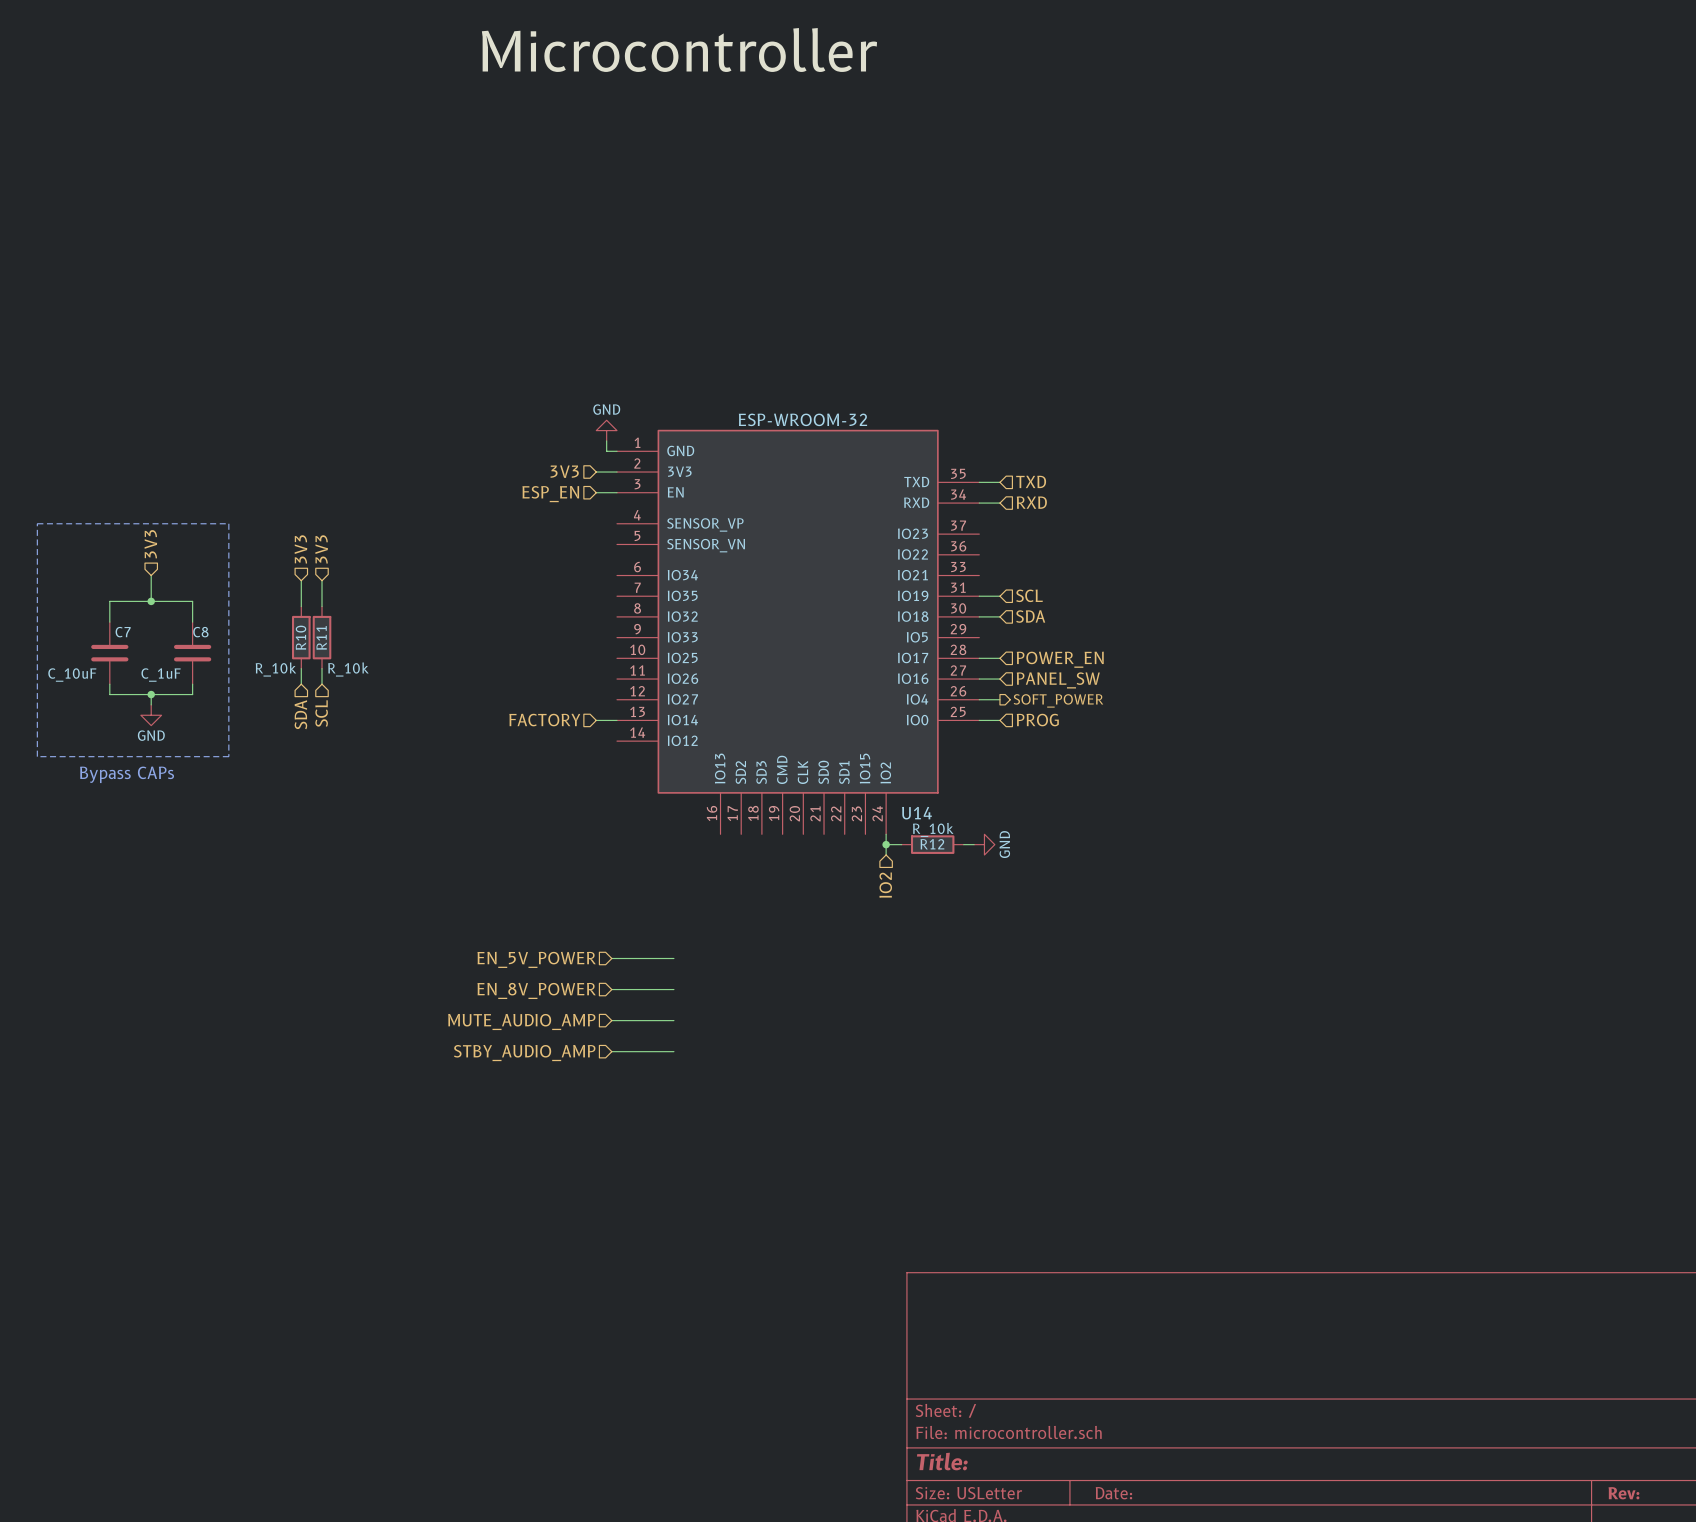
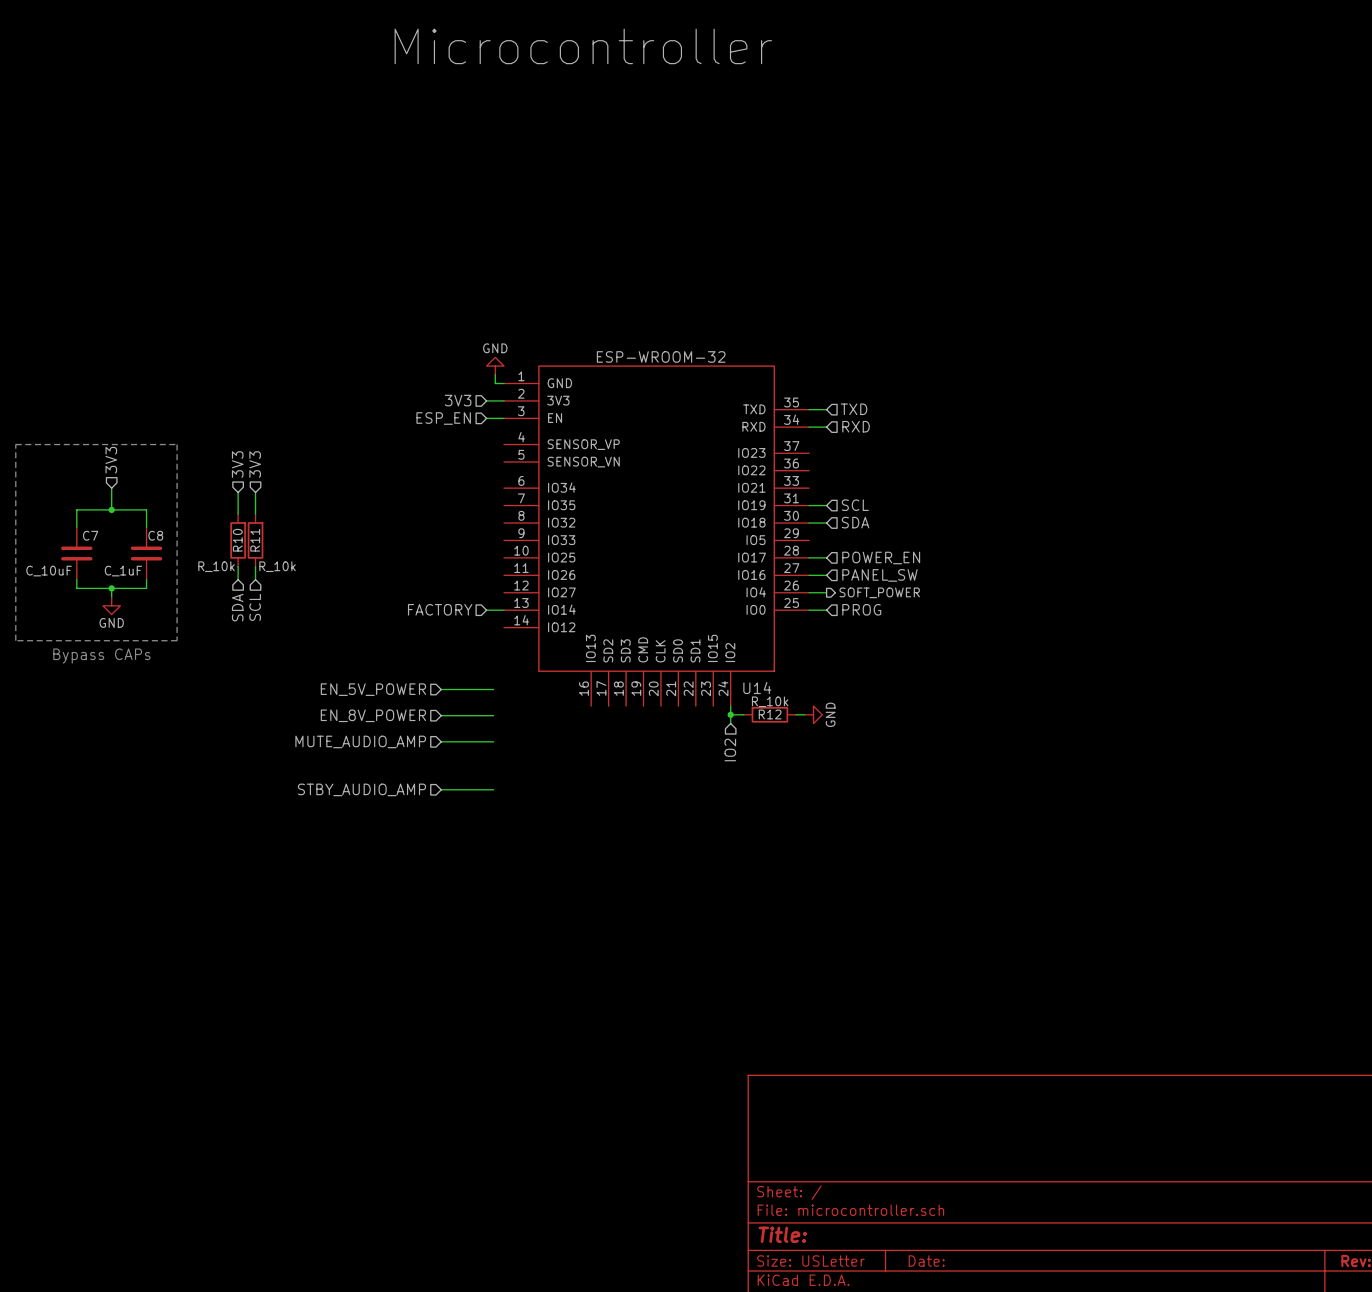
wire: none -> (441, 689) (493, 689)
wire: (611, 958) (673, 958) -> (441, 789) (493, 789)
hierarchical label position: EN_5V_POWER (536, 959) -> EN_5V_POWER (373, 689)
wire: (611, 989) (673, 989) -> (441, 741) (493, 741)
hierarchical label position: EN_8V_POWER (536, 990) -> EN_8V_POWER (373, 715)
wire: (611, 1020) (673, 1020) -> (441, 715) (493, 715)
hierarchical label position: MUTE_AUDIO_AMP (521, 1022) -> MUTE_AUDIO_AMP (360, 741)
wire: (611, 1051) (673, 1051) -> none
hierarchical label position: STBY_AUDIO_AMP (524, 1053) -> STBY_AUDIO_AMP (361, 789)

